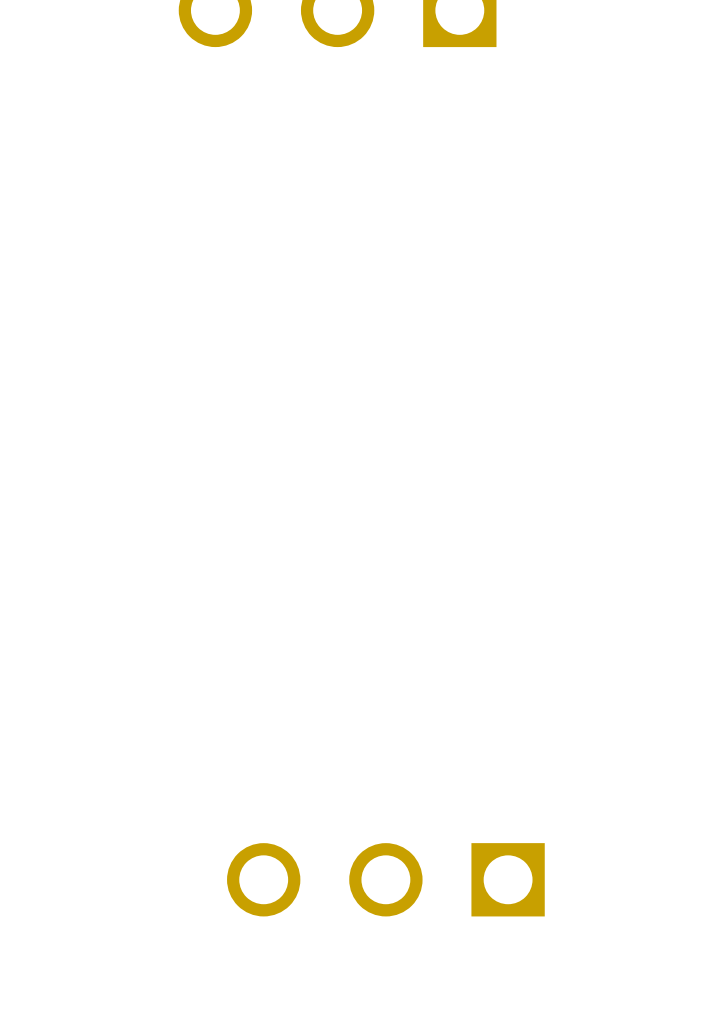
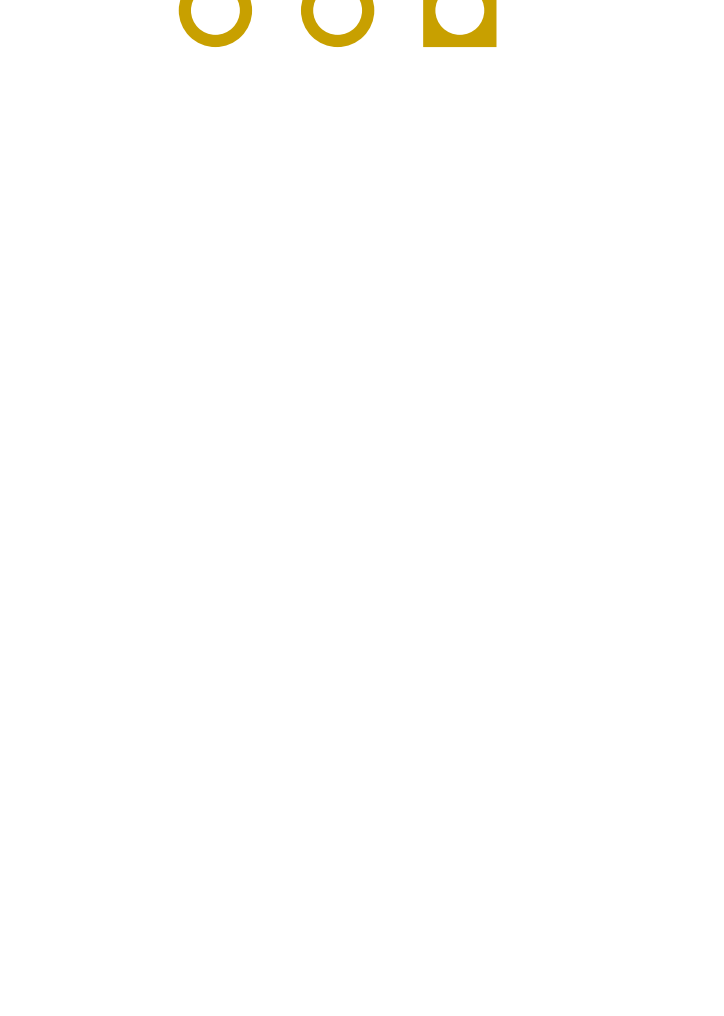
part: (385, 879) -> none

